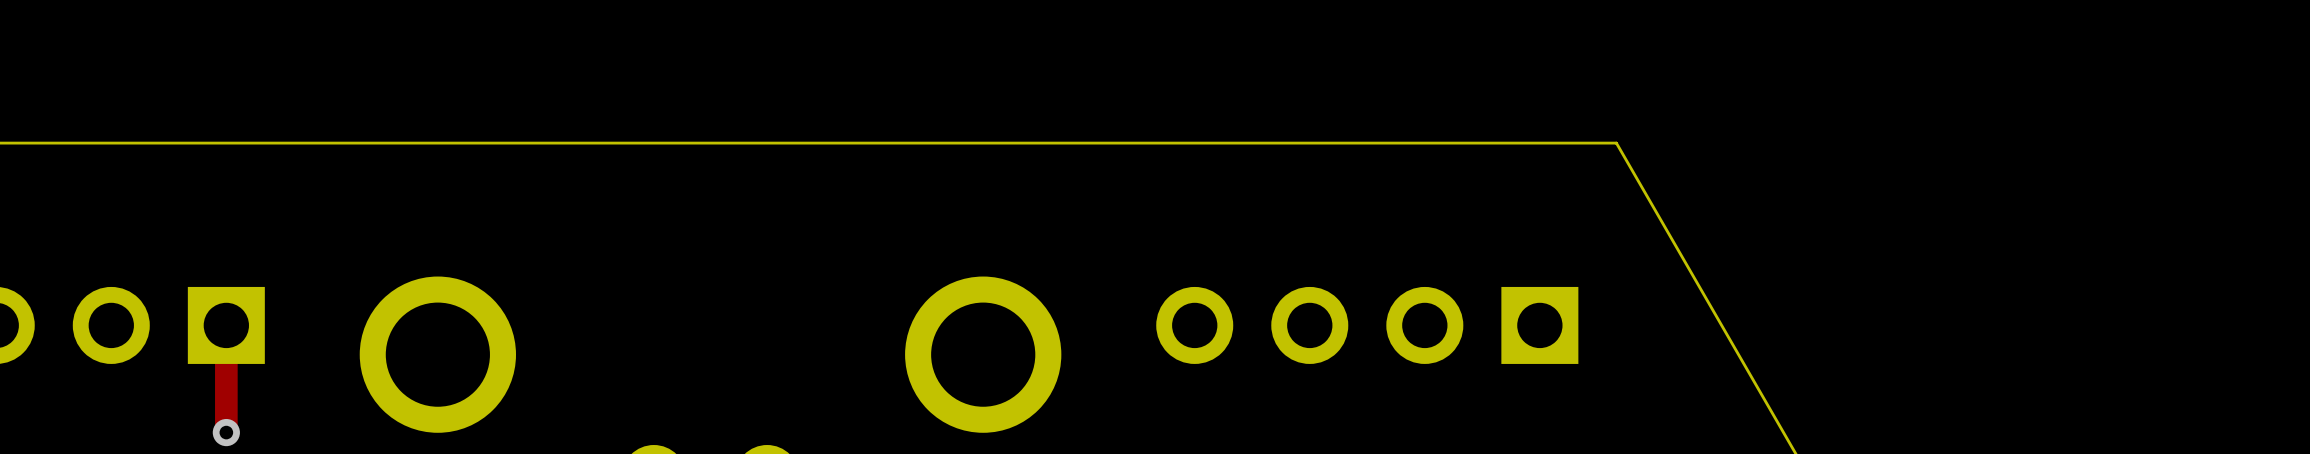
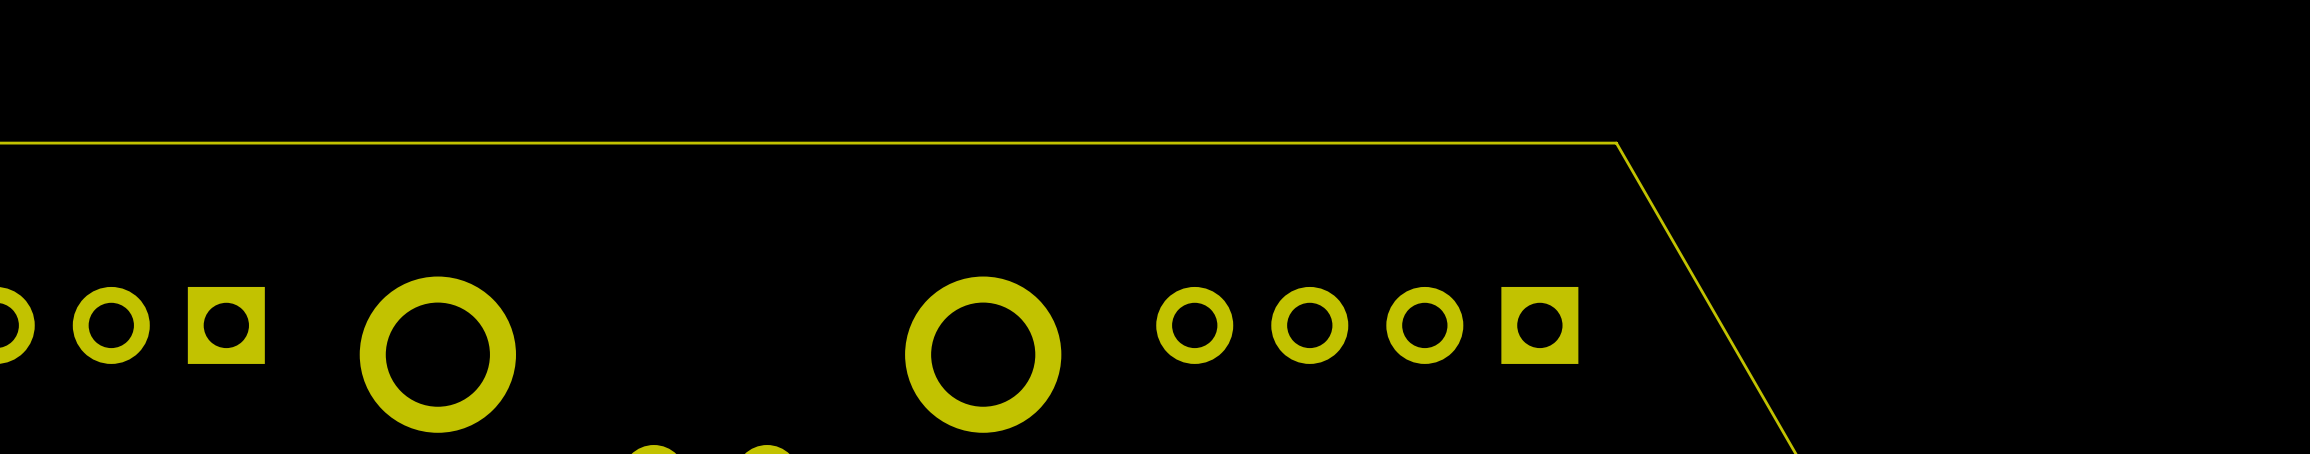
top track: (226, 325) (226, 432) -> none
via: (226, 432) -> none

